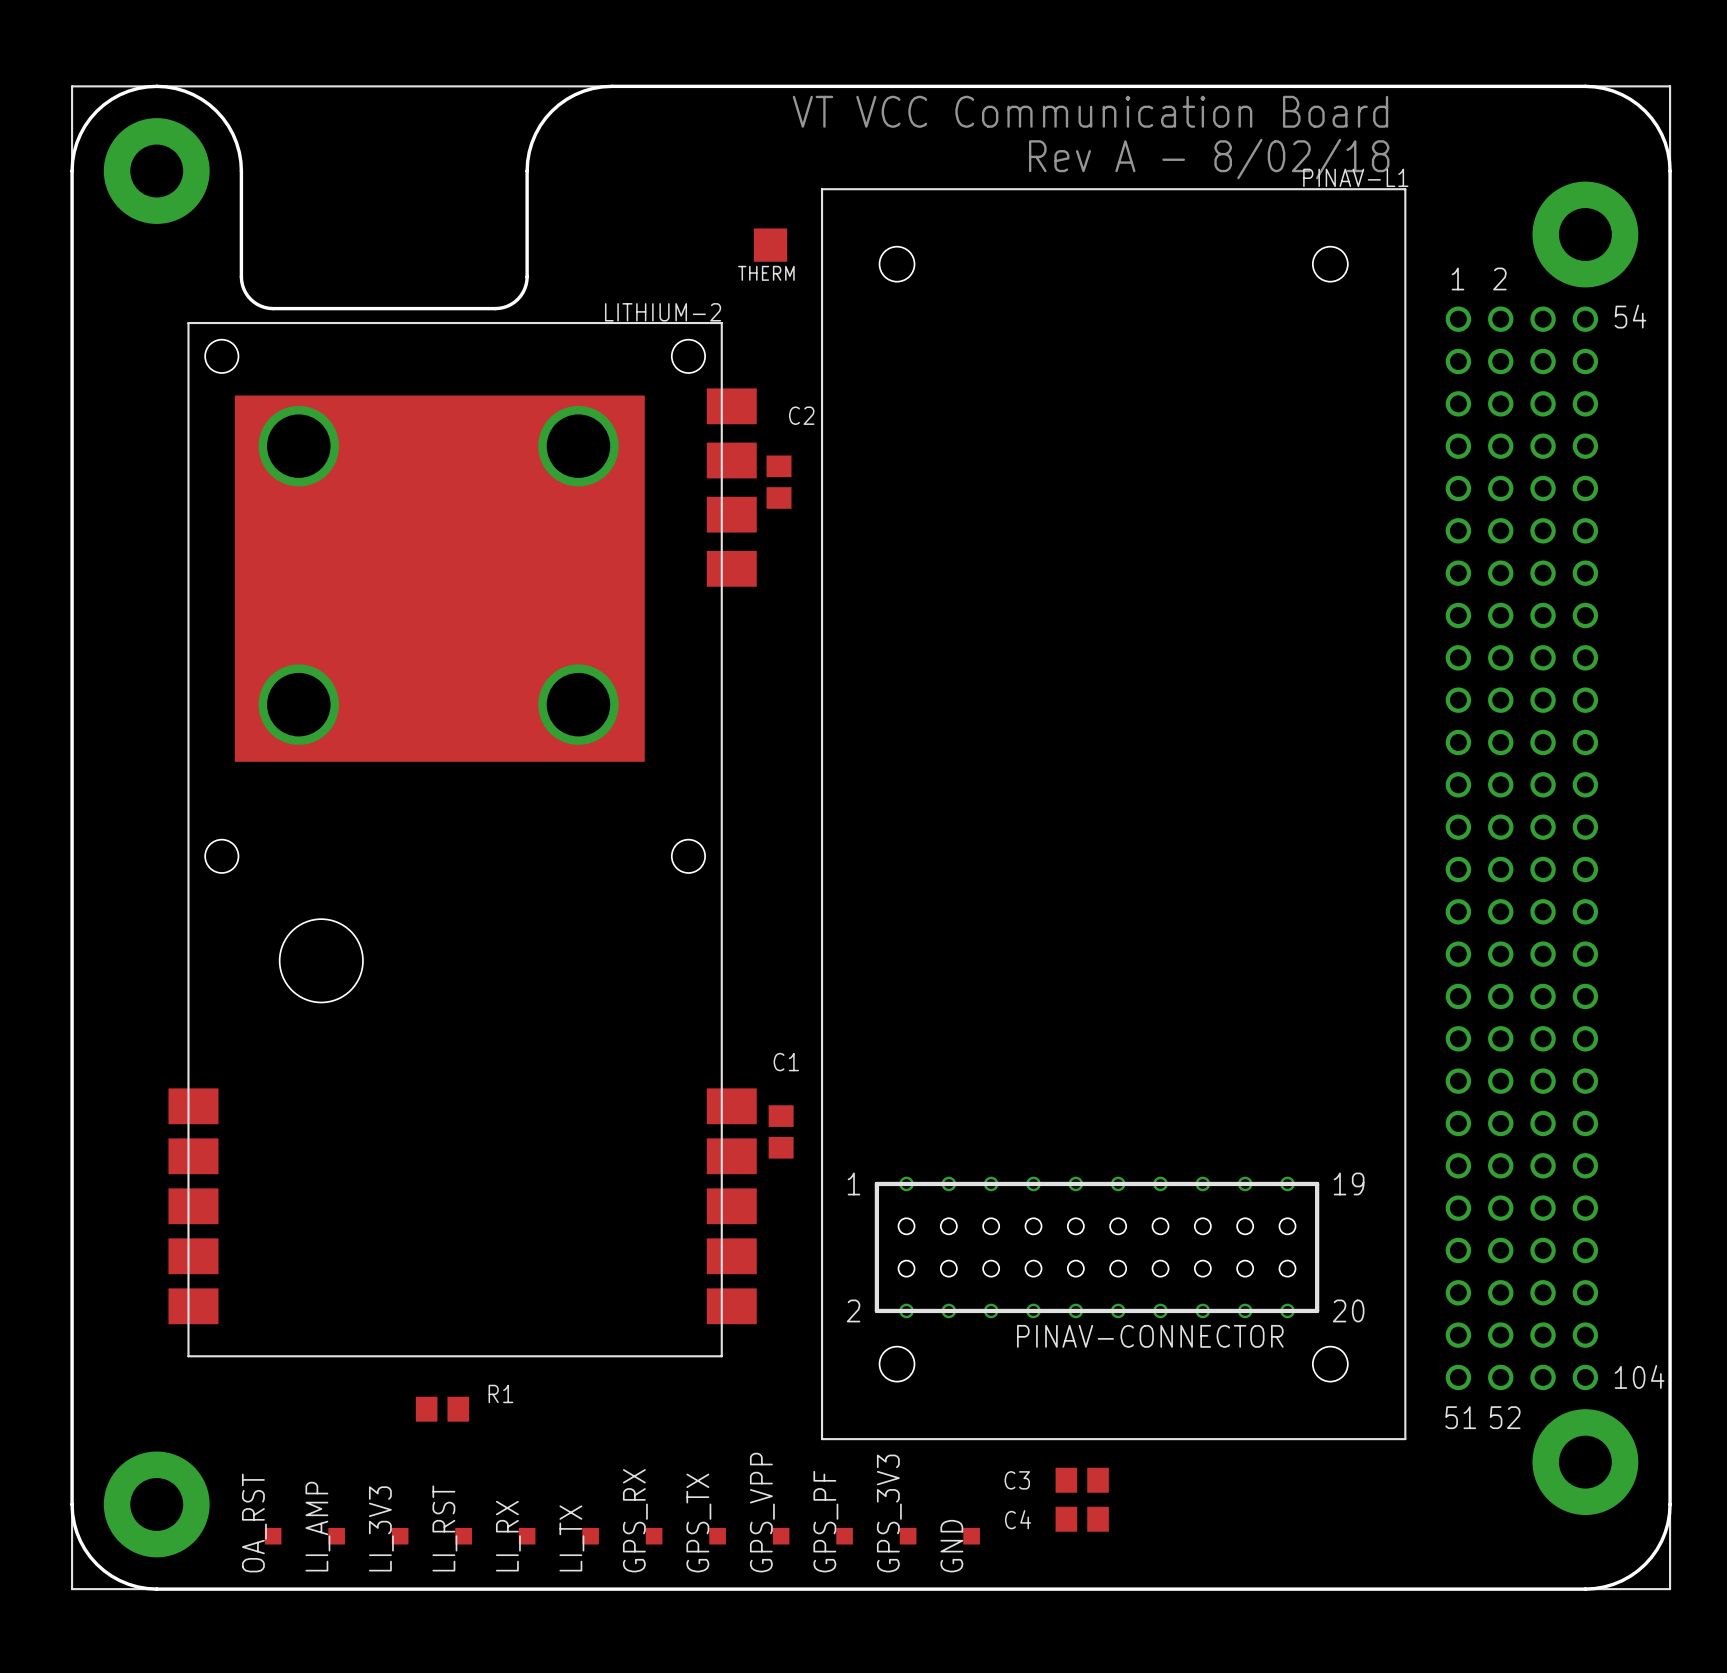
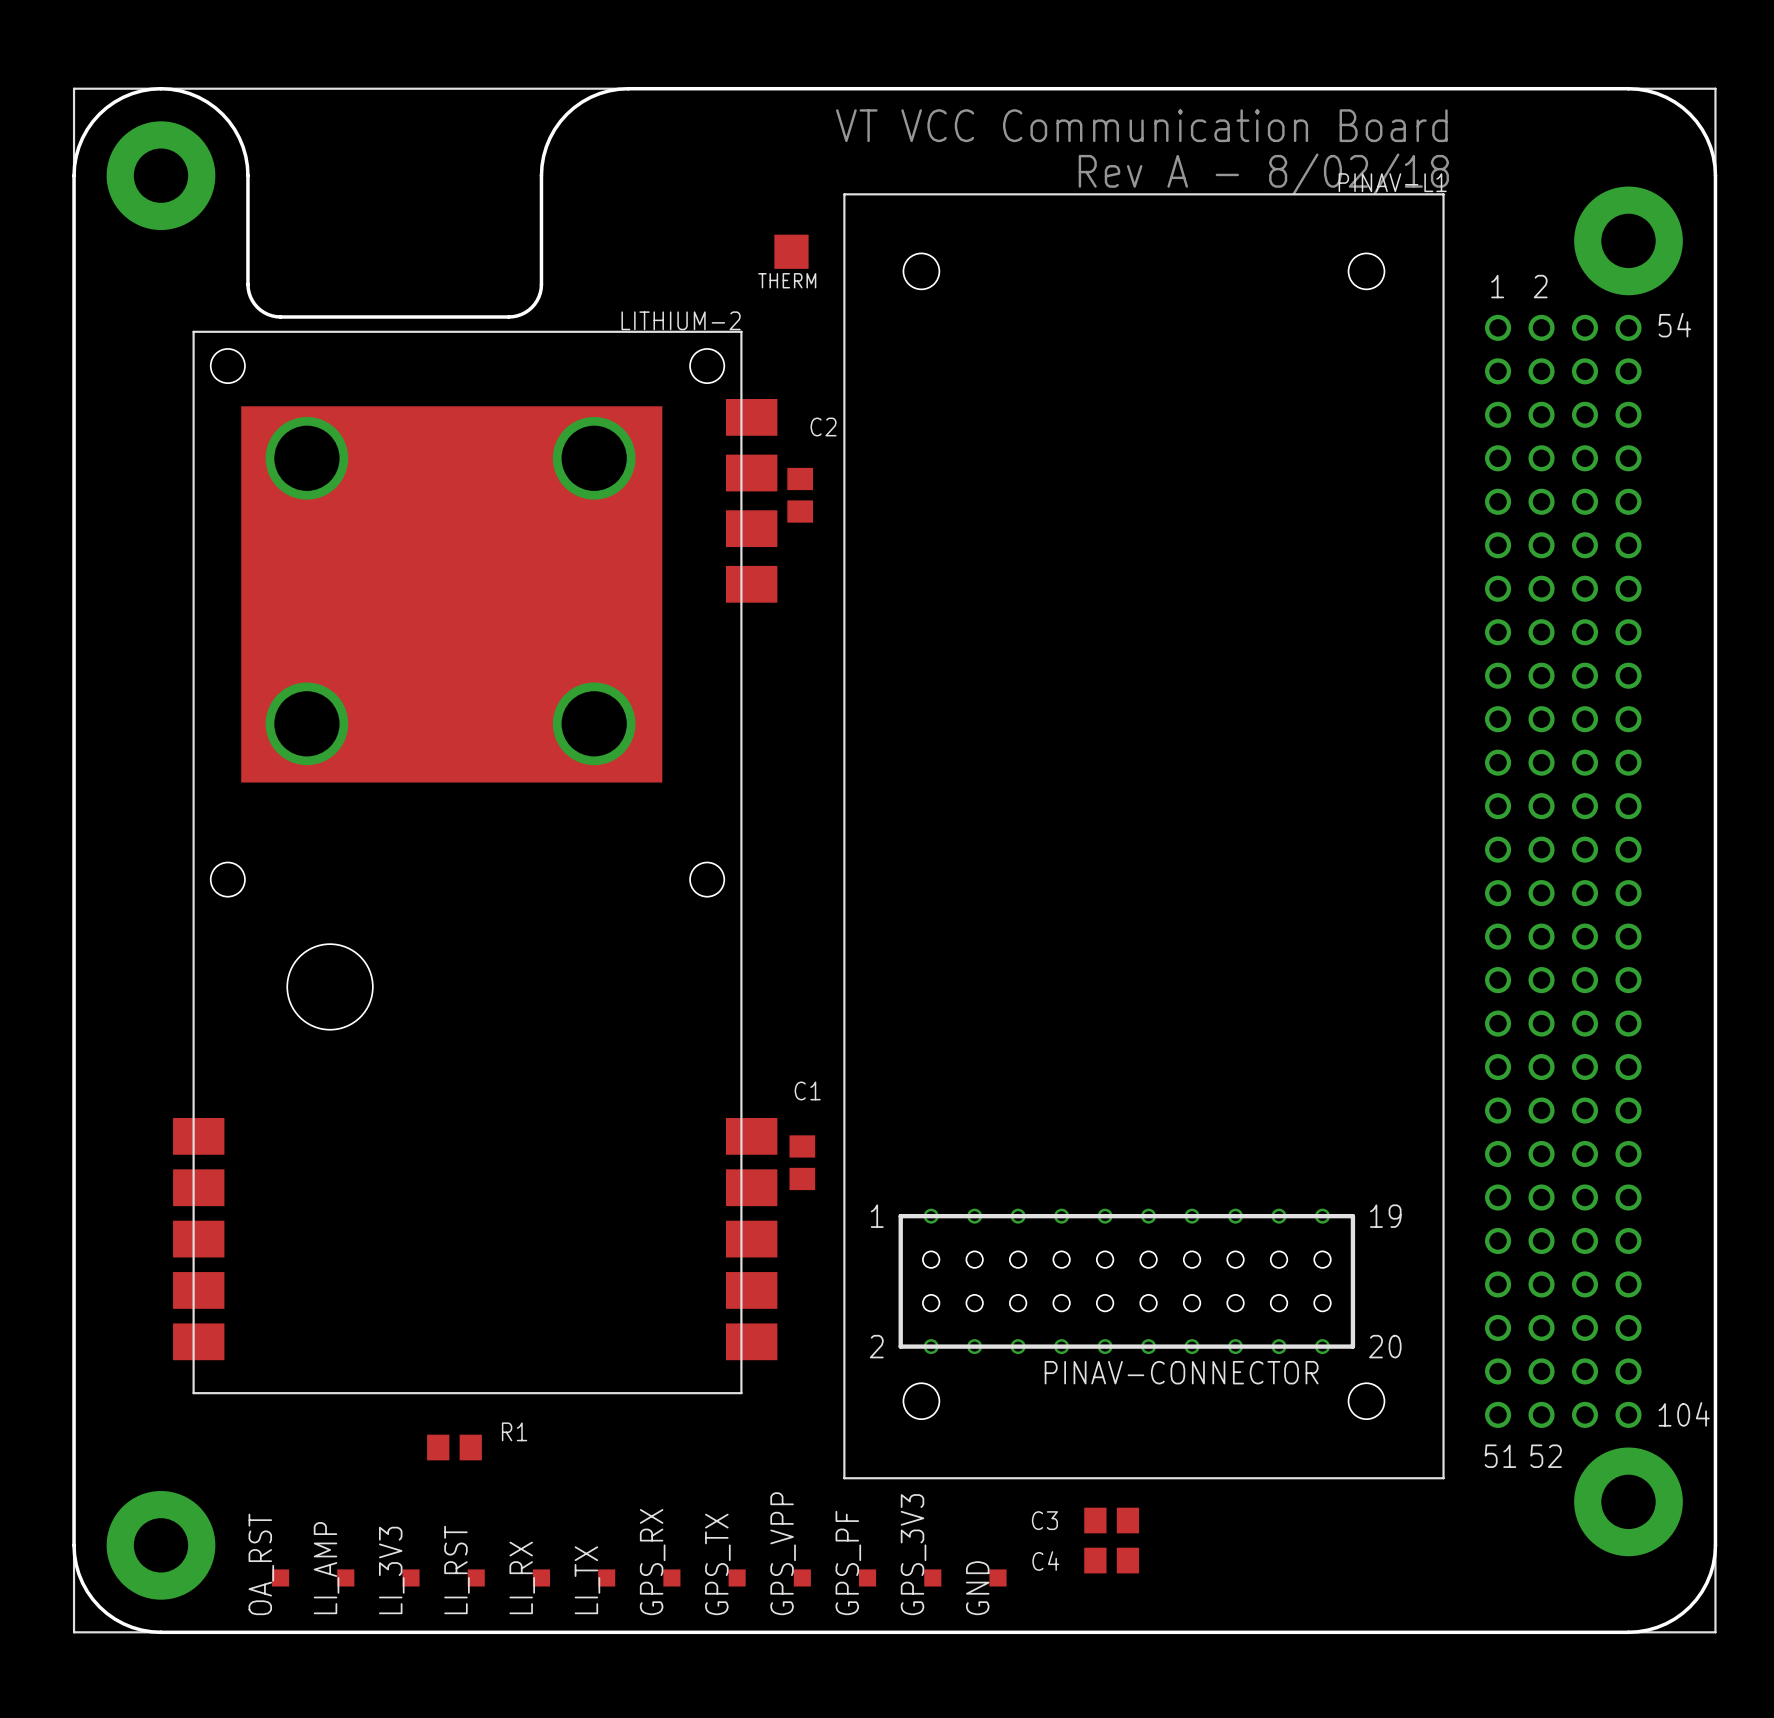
text position: VT VCC Communication Board (1090, 111) -> VT VCC Communication Board (1141, 125)
text position: Rev A - 8/02/18 (1209, 159) -> Rev A - 8/02/18 (1263, 174)

